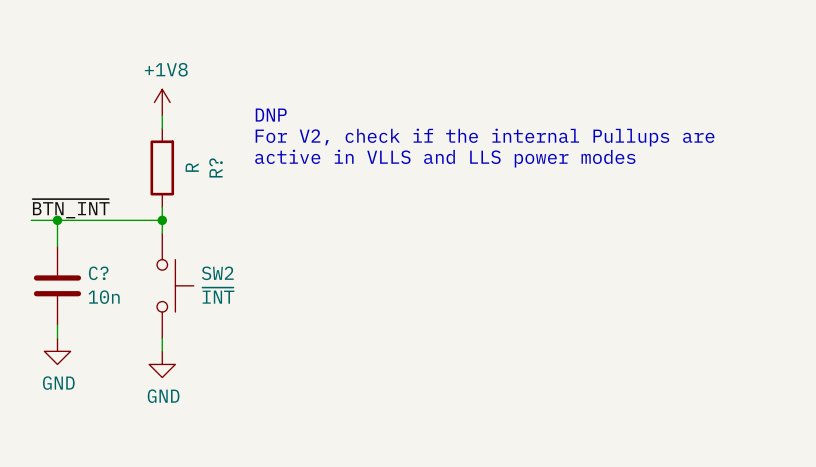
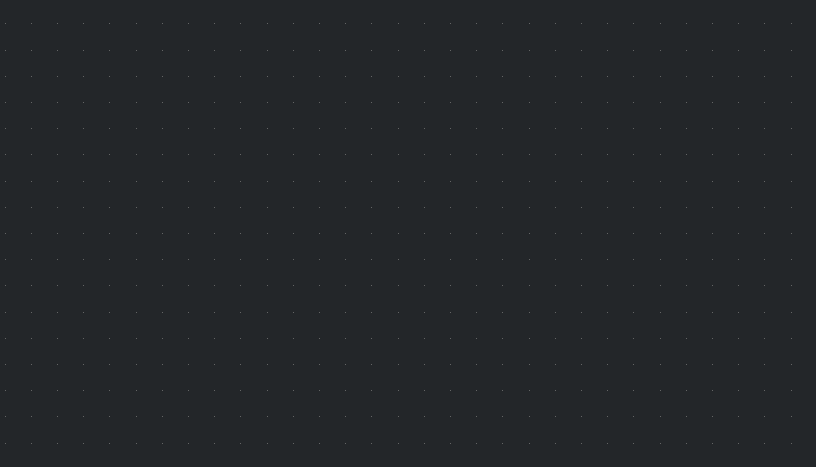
power symbol: +1V8 (162, 102) -> none
wire: (162, 115) (162, 128) -> none
text: DNP (271, 115) -> none
text: For V2, check if the internal Pullups are (485, 137) -> none
text: active in VLLS and LLS power modes (445, 158) -> none
R?: R (162, 167) -> none
wire: (162, 207) (162, 233) -> none
label: ~{BTN_INT} (71, 208) -> none
wire: (31, 220) (162, 220) -> none
wire: (57, 220) (57, 246) -> none
junction: (57, 220) -> none
junction: (162, 220) -> none
C?: 10n (57, 285) -> none
SW2: ~{INT} (175, 285) -> none
wire: (57, 325) (57, 338) -> none
wire: (162, 338) (162, 351) -> none
power symbol: GND (57, 351) -> none
power symbol: GND (162, 364) -> none

